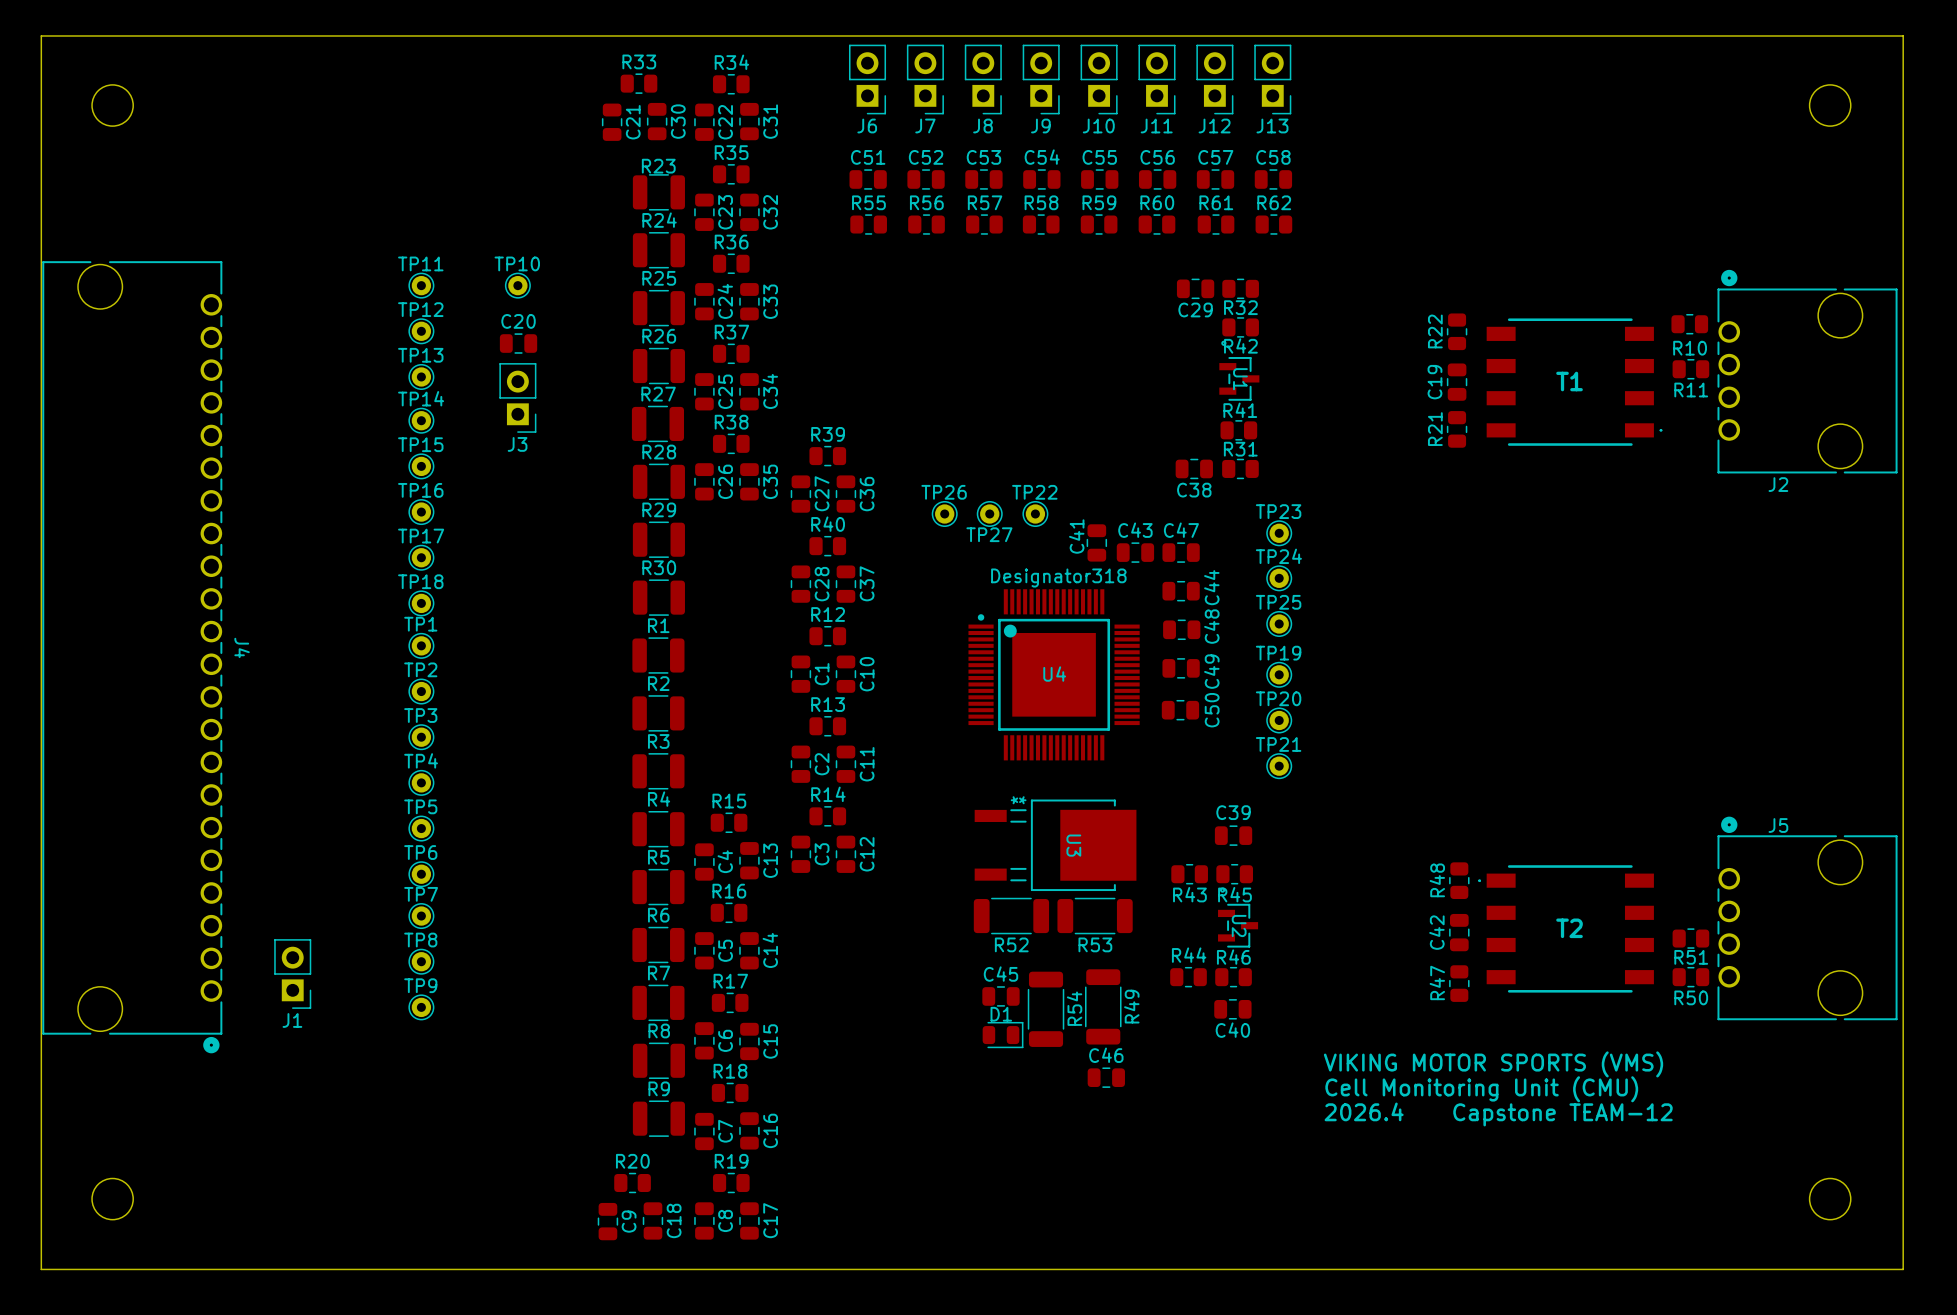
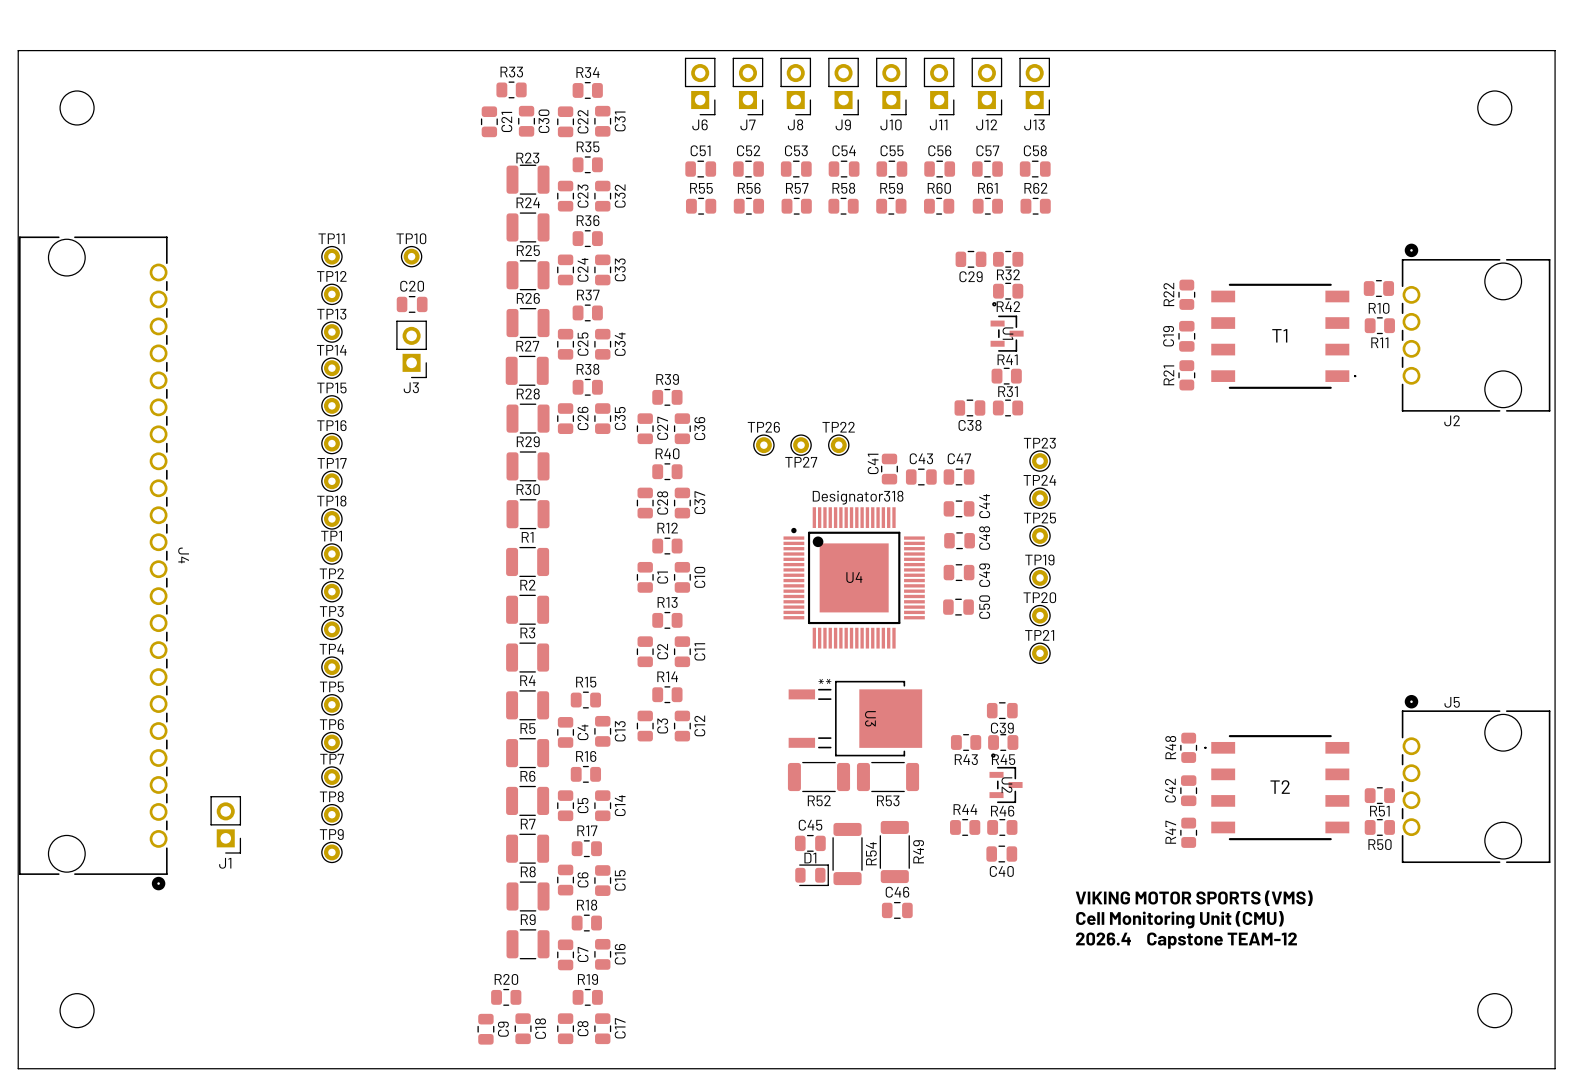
C39 name position: C39 (1233, 812) -> C39 (1002, 728)

